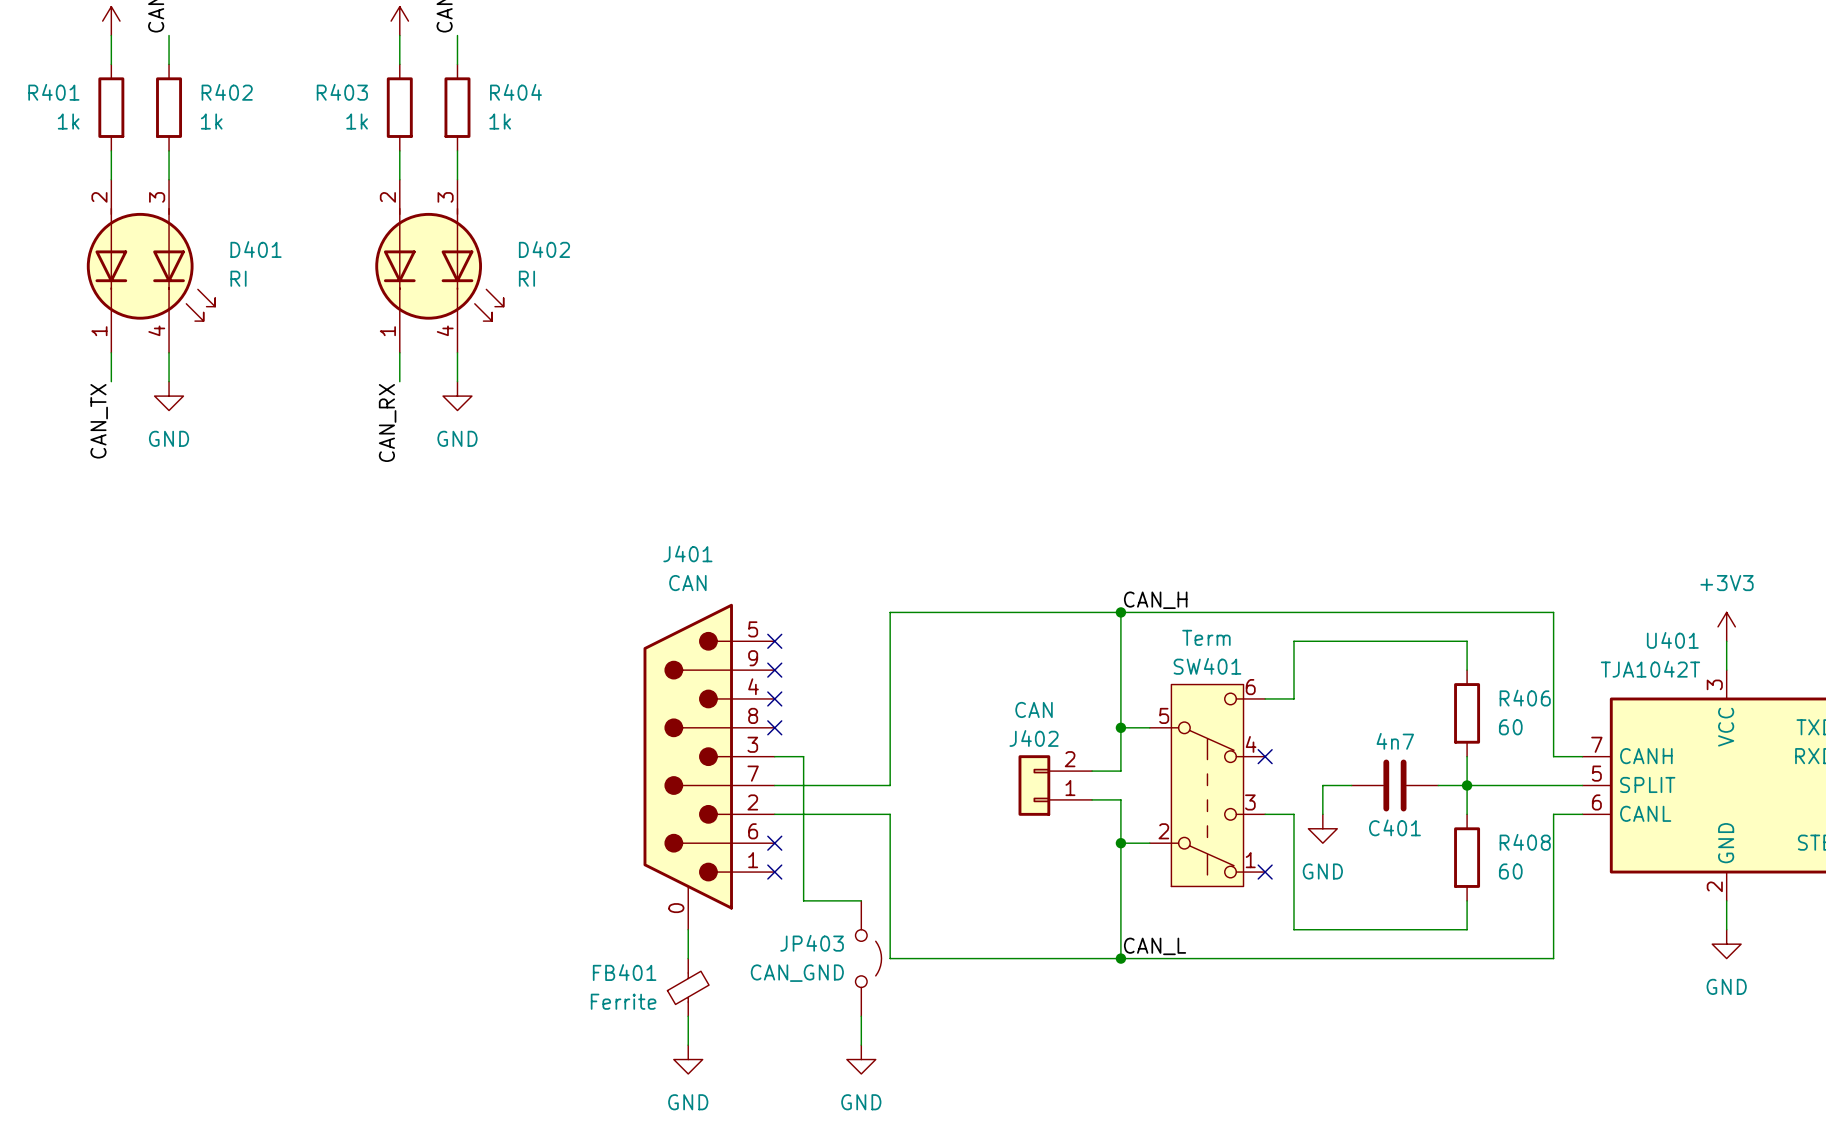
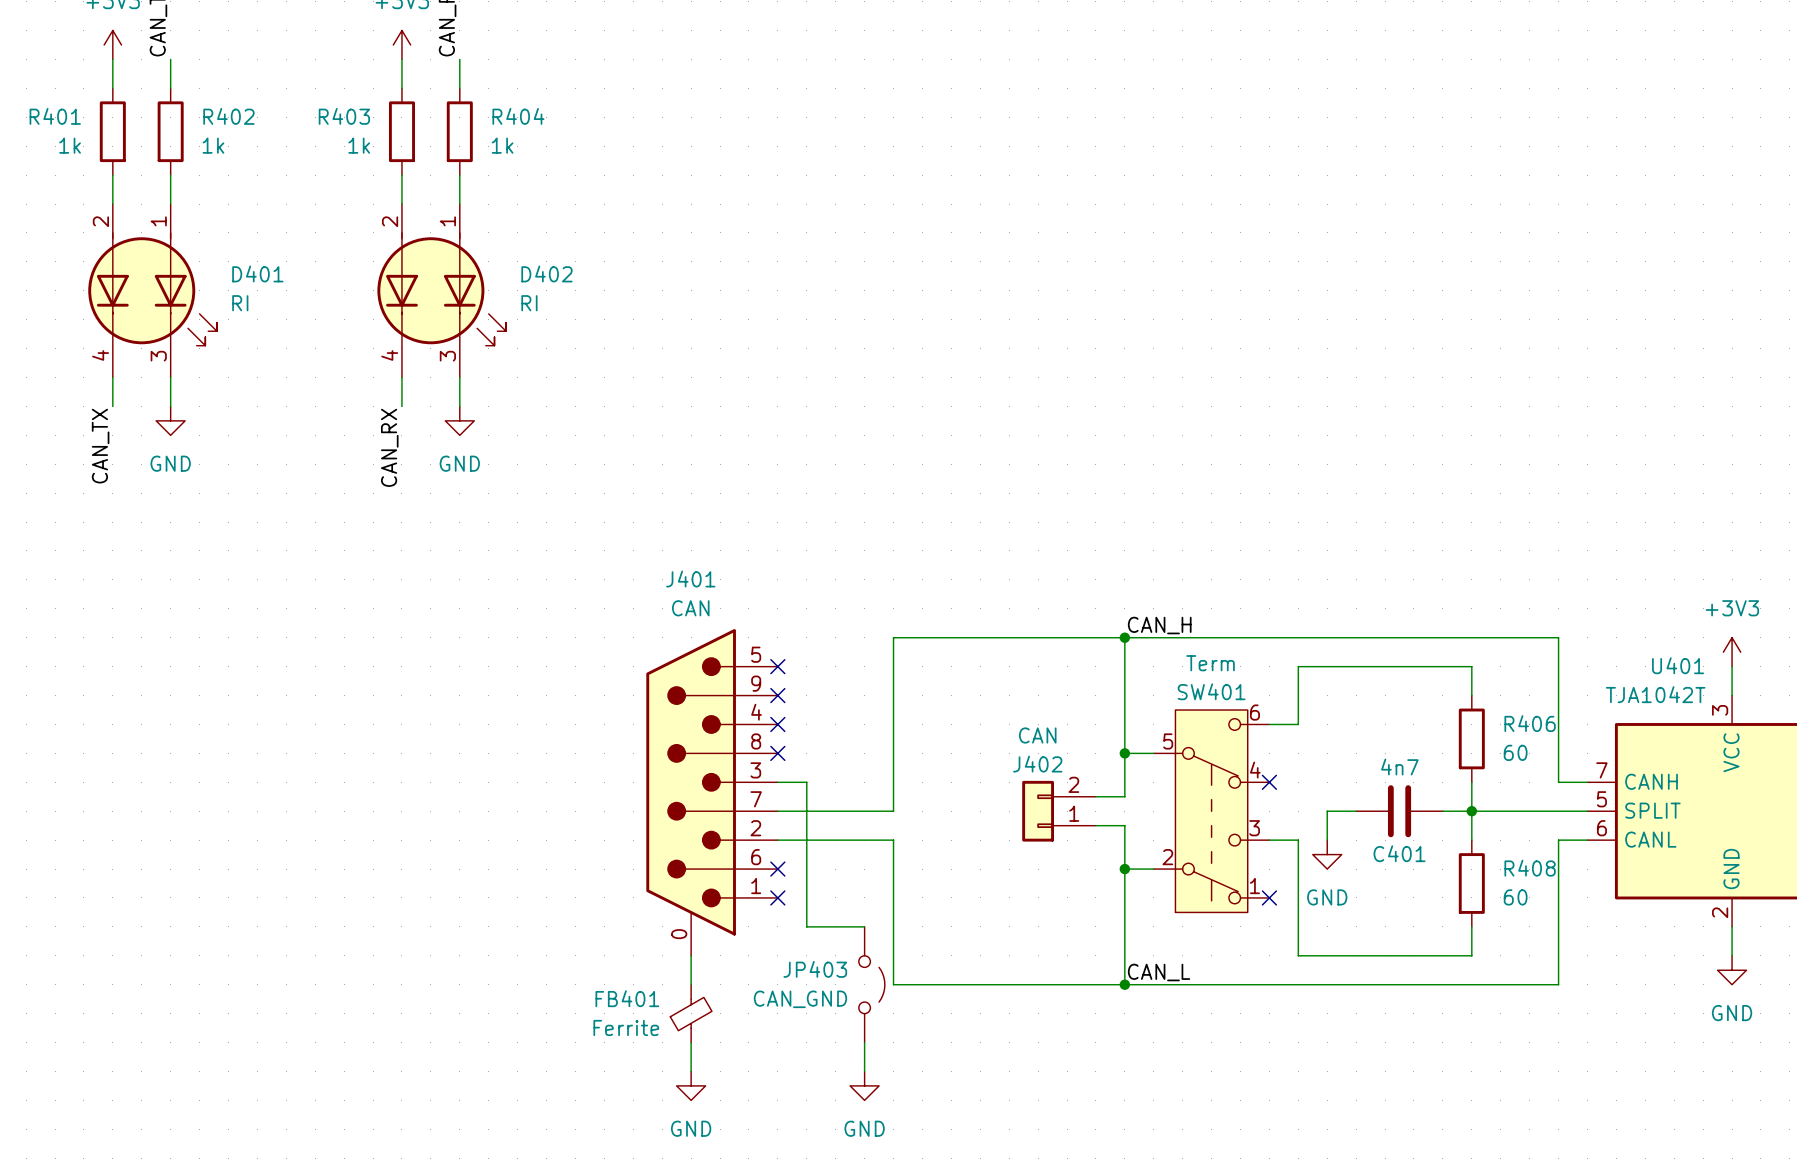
D401 pin number: 3 (157, 197) -> 1 (158, 221)
D402 pin number: 3 (445, 197) -> 1 (447, 221)
D401 pin number: 4 (156, 330) -> 3 (158, 356)
D402 pin number: 4 (445, 330) -> 3 (447, 356)
D401 pin number: 1 (99, 331) -> 4 (100, 355)
D402 pin number: 1 (387, 331) -> 4 (389, 355)

